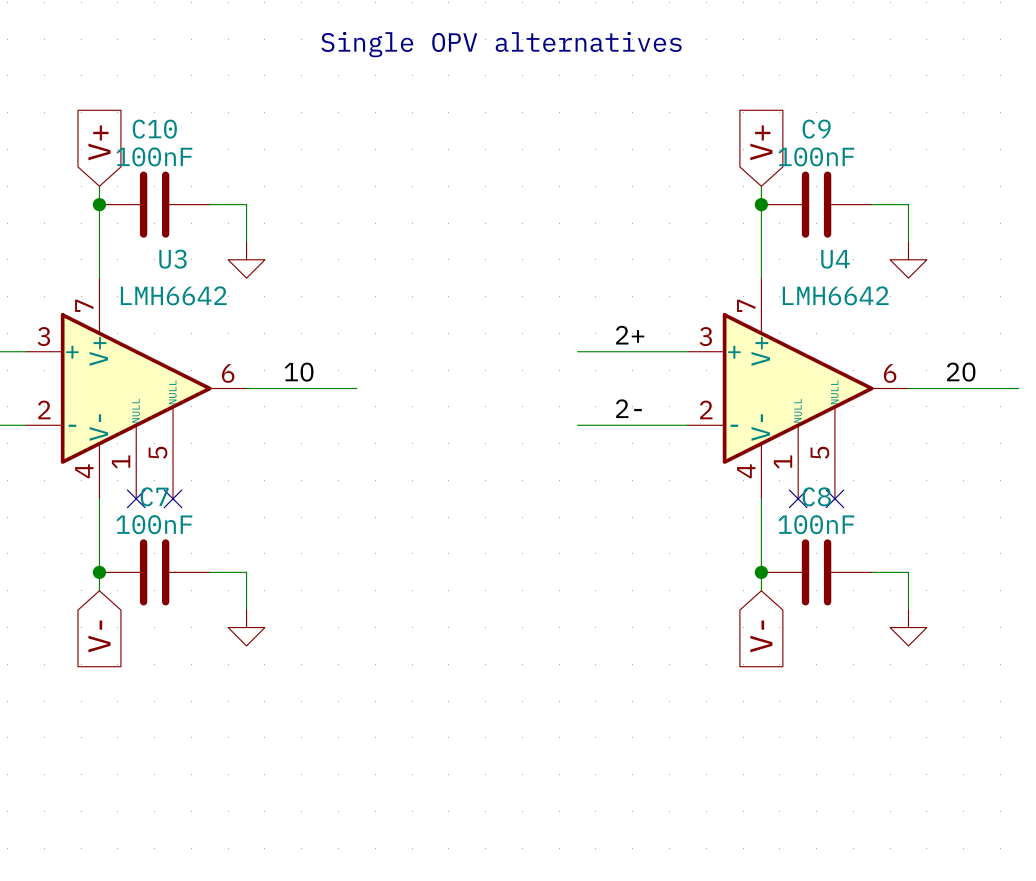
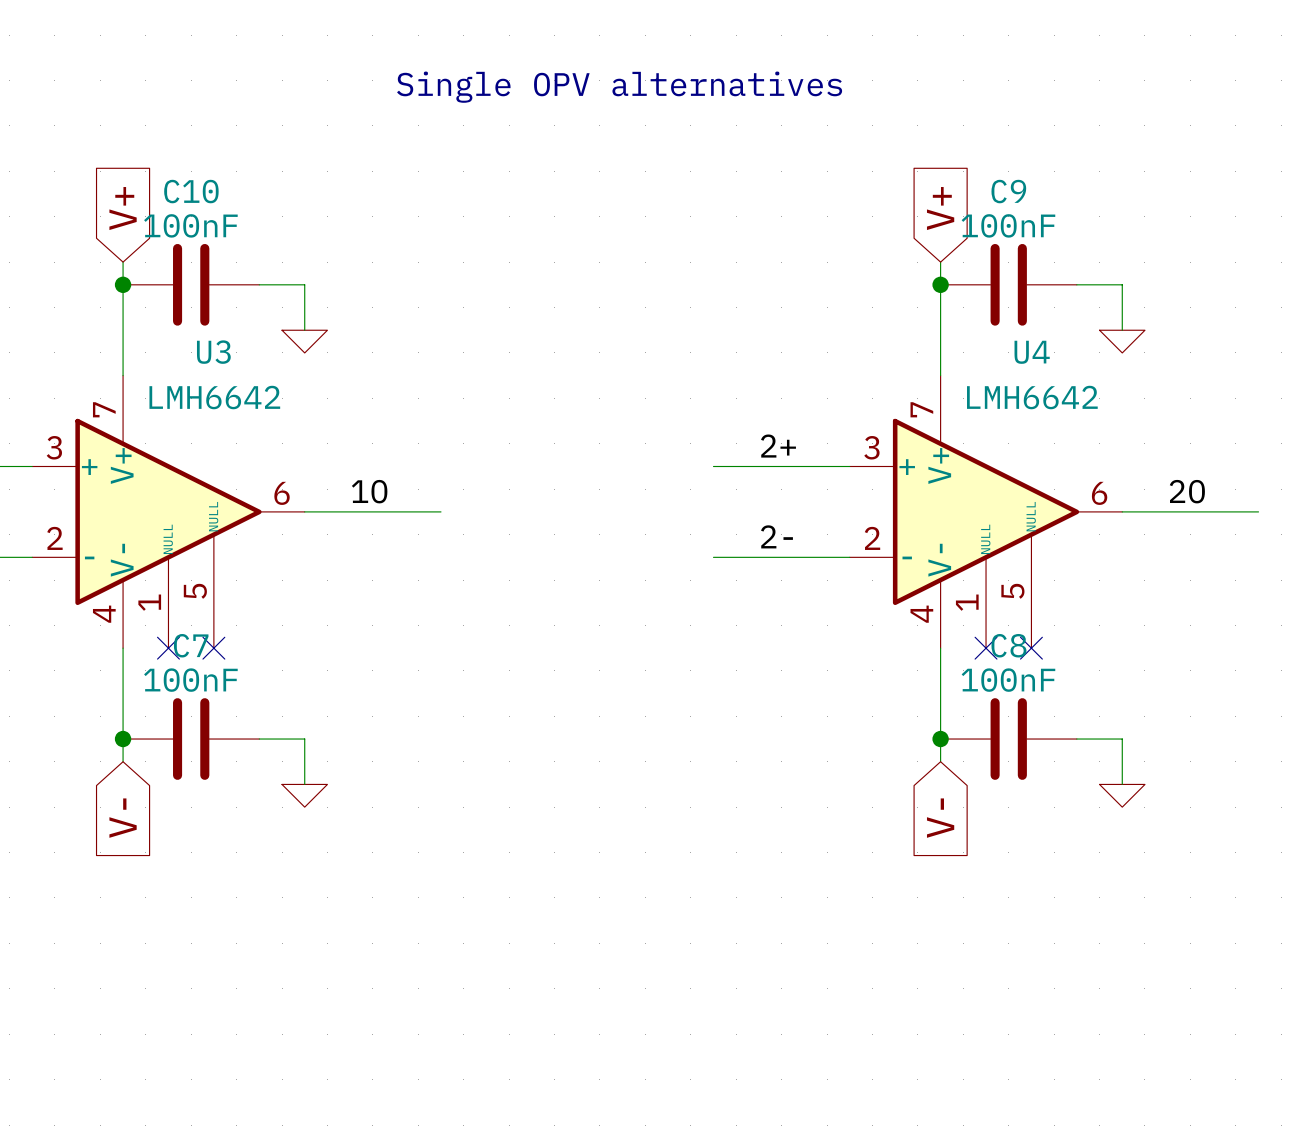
power symbol shape: [228, 241, 265, 279] -> [282, 330, 328, 353]
power symbol shape: [890, 241, 927, 279] -> [1099, 330, 1145, 353]
power symbol shape: [228, 609, 265, 646] -> [282, 784, 328, 808]
power symbol shape: [890, 609, 927, 646] -> [1099, 784, 1145, 808]

